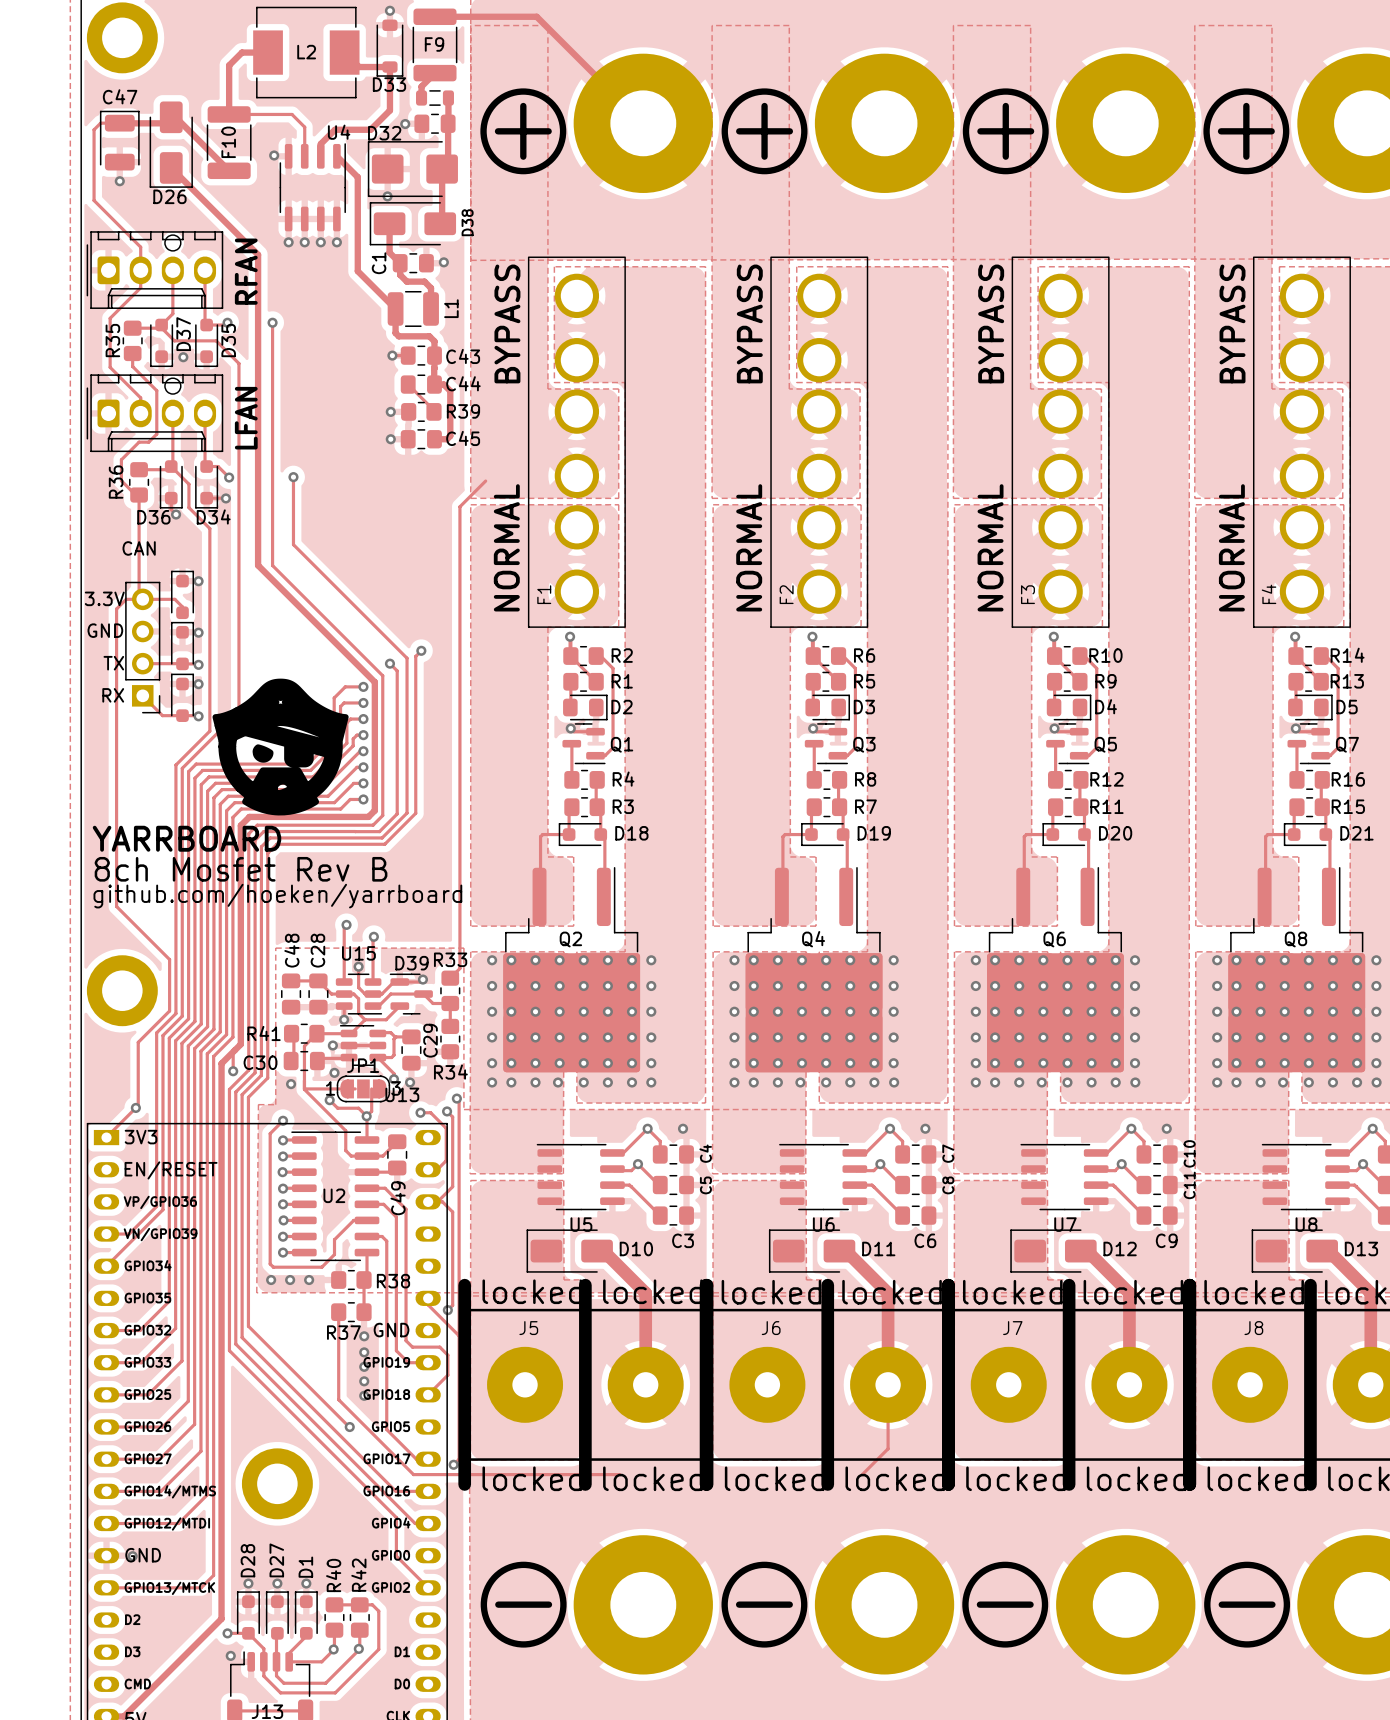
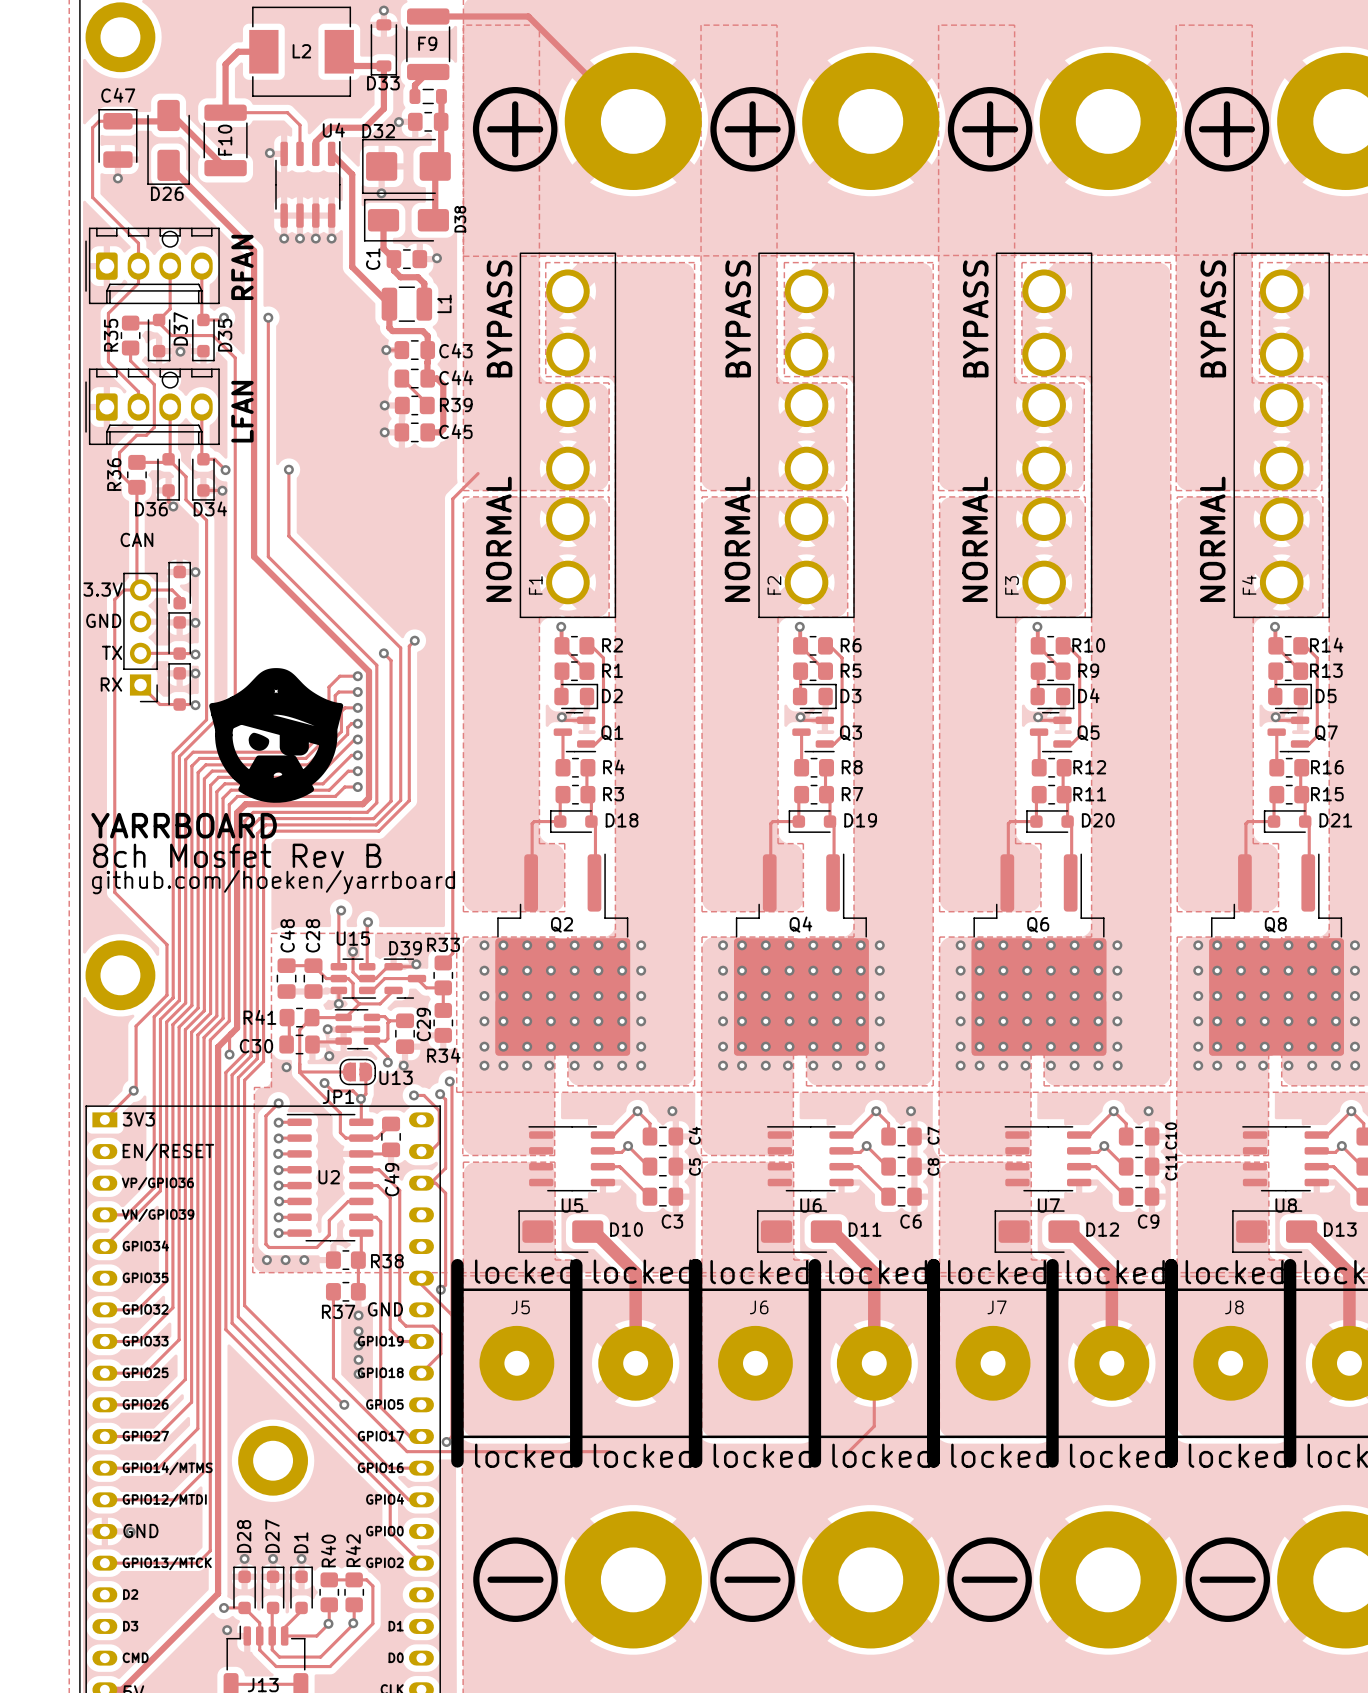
JP1 name position: JP1 (363, 1065) -> JP1 (338, 1096)
JP1 footprint: [336, 1075, 391, 1103] -> [339, 1058, 376, 1086]

